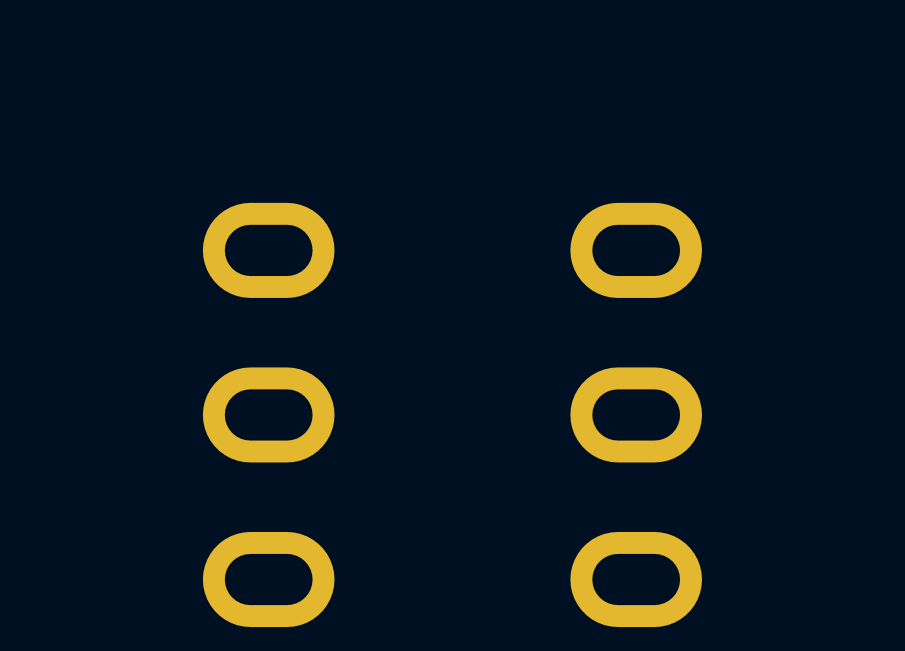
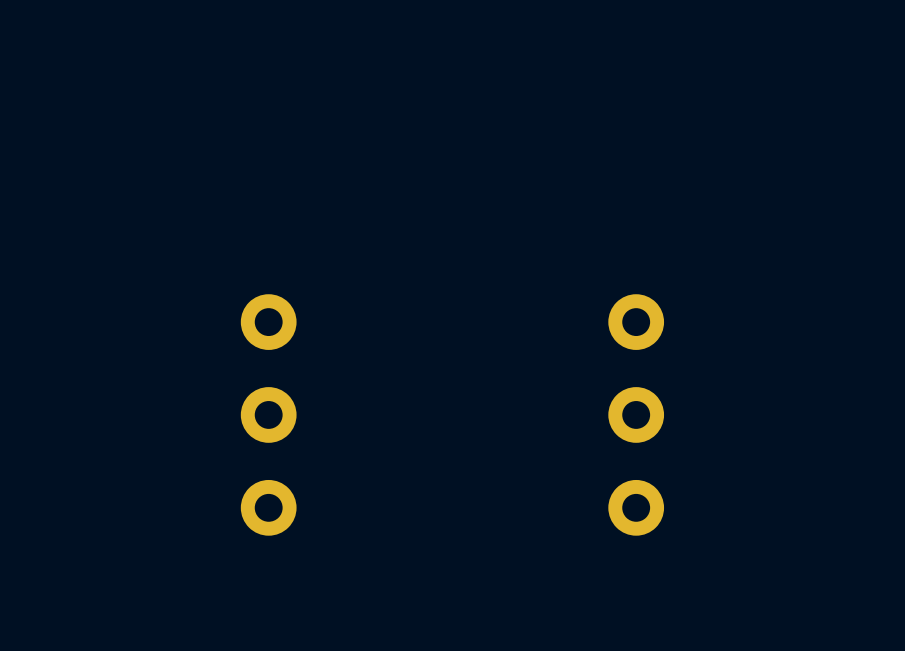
part footprint: [202, 202, 335, 628] -> [240, 294, 297, 536]
part footprint: [570, 202, 703, 628] -> [608, 294, 665, 536]

